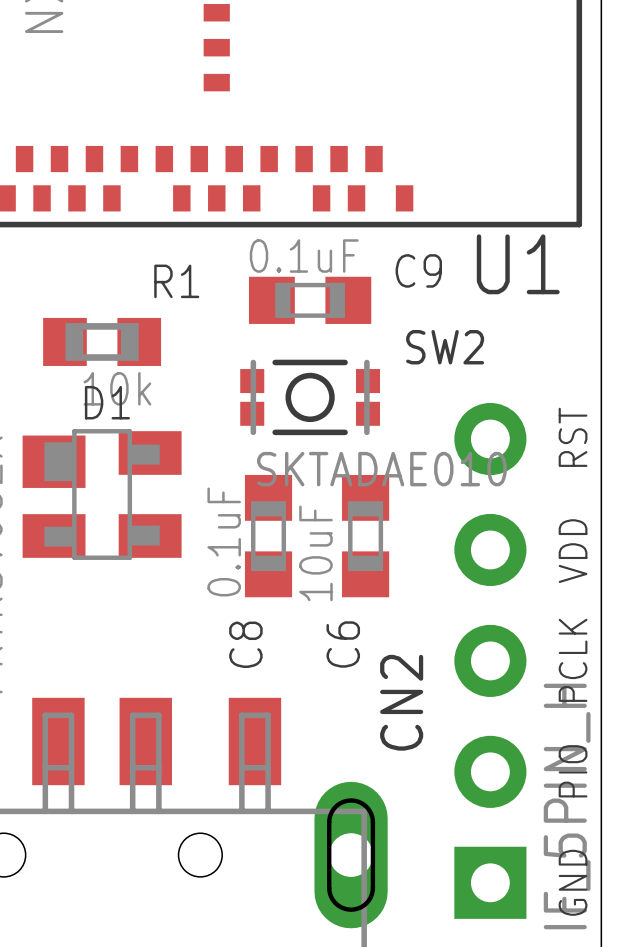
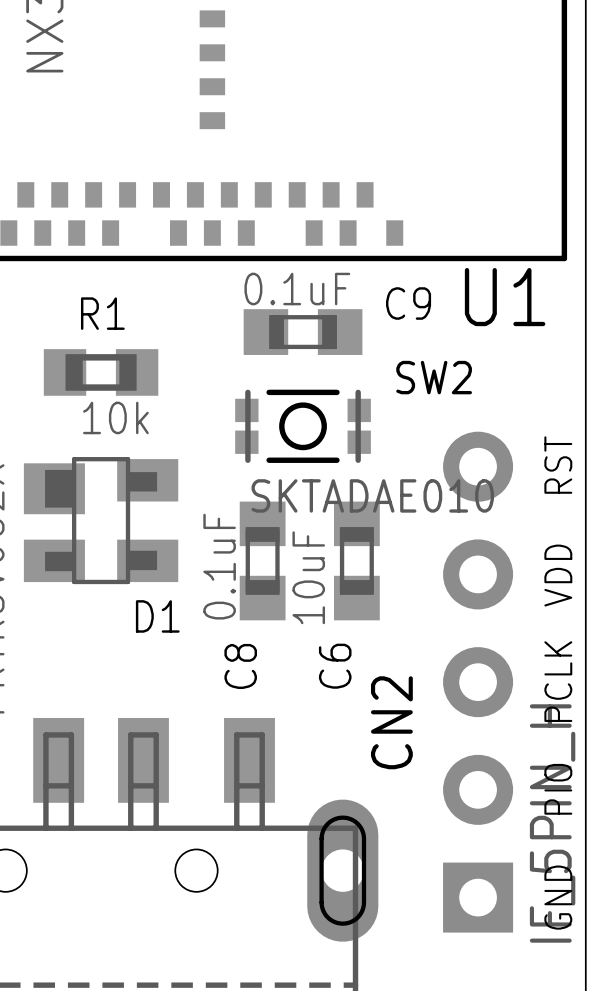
R1 name position: R1 (176, 281) -> R1 (102, 313)
D1 name position: D1 (107, 402) -> D1 (157, 616)

